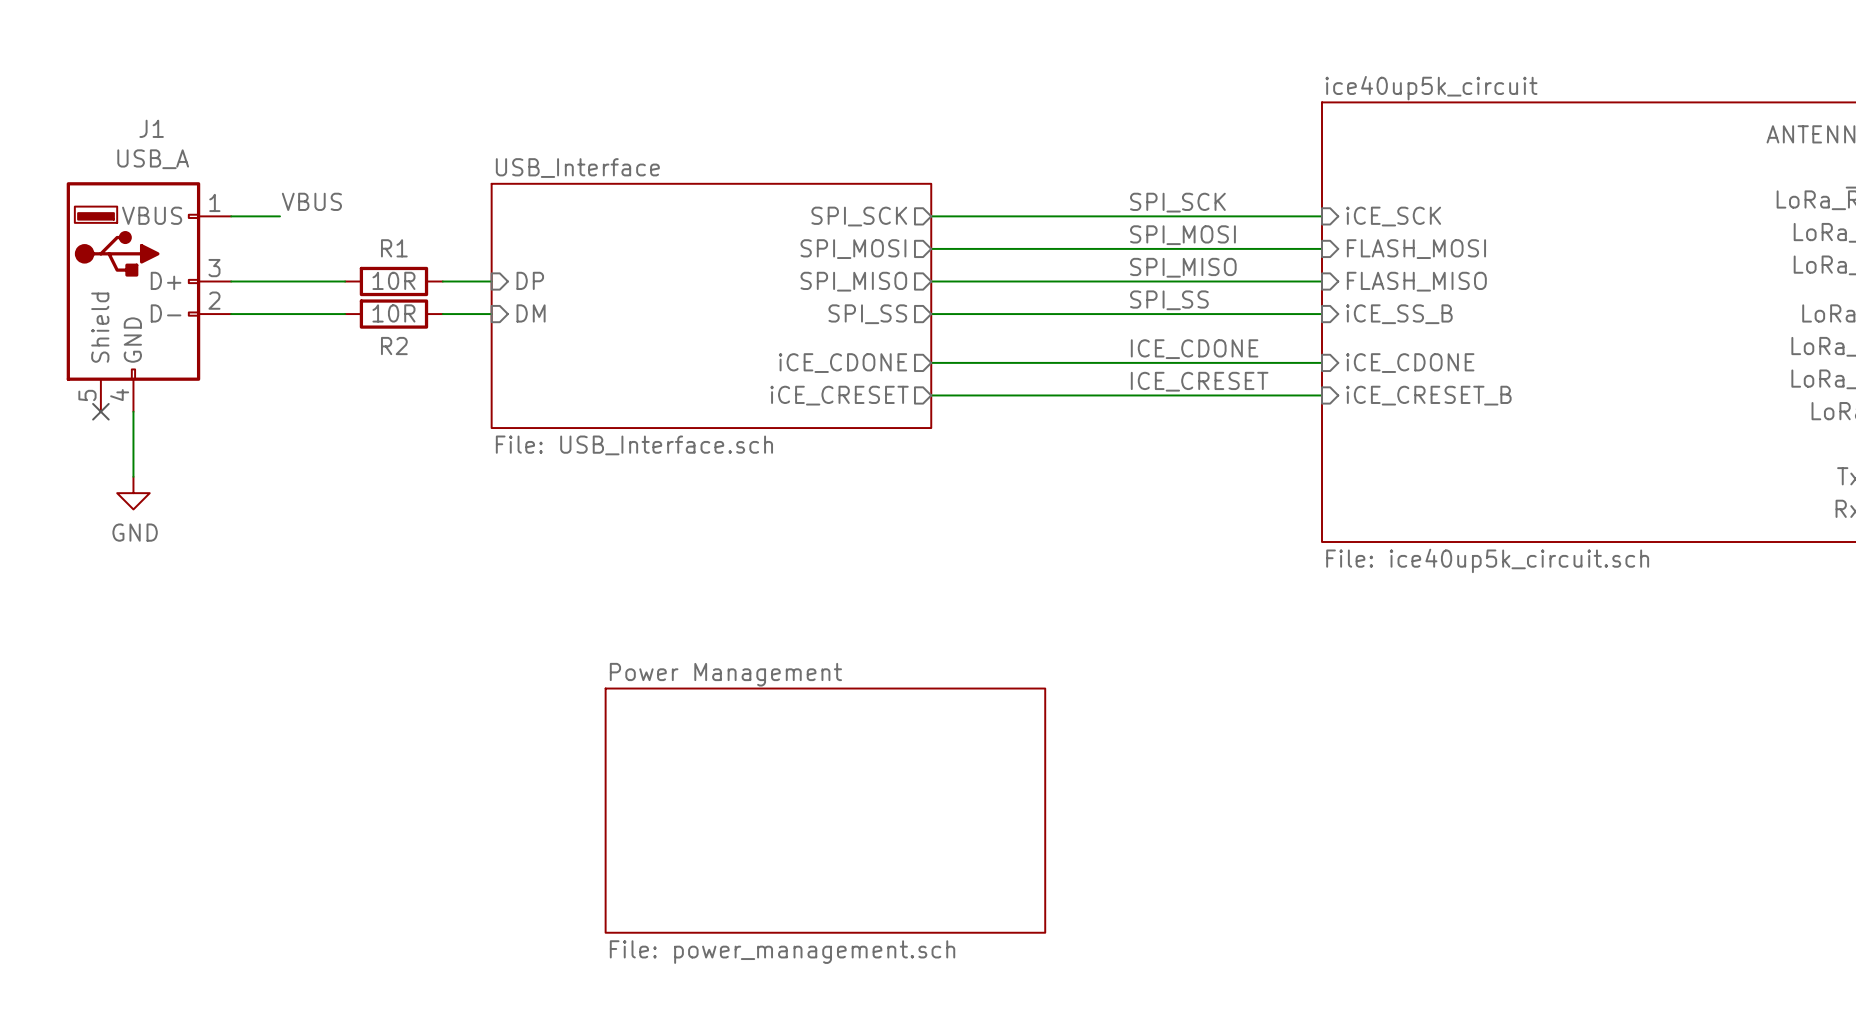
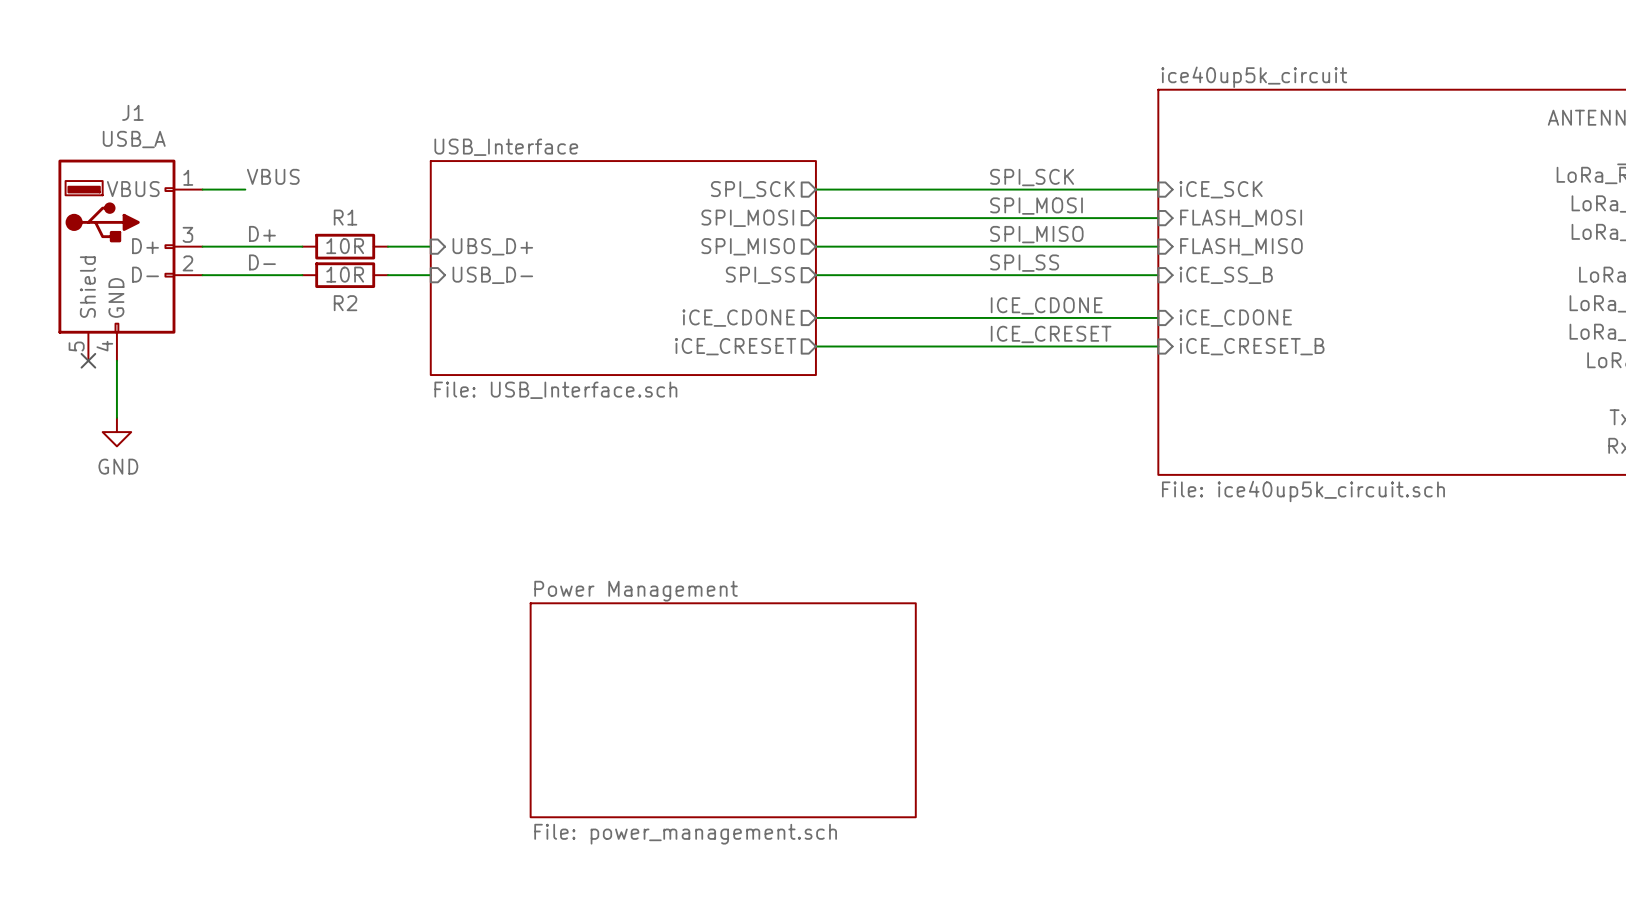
label: none -> D+ (262, 233)
sheet pin: DP (530, 280) -> UBS_D+ (492, 246)
label: none -> D- (262, 262)
sheet pin: DM (531, 313) -> USB_D- (492, 275)

